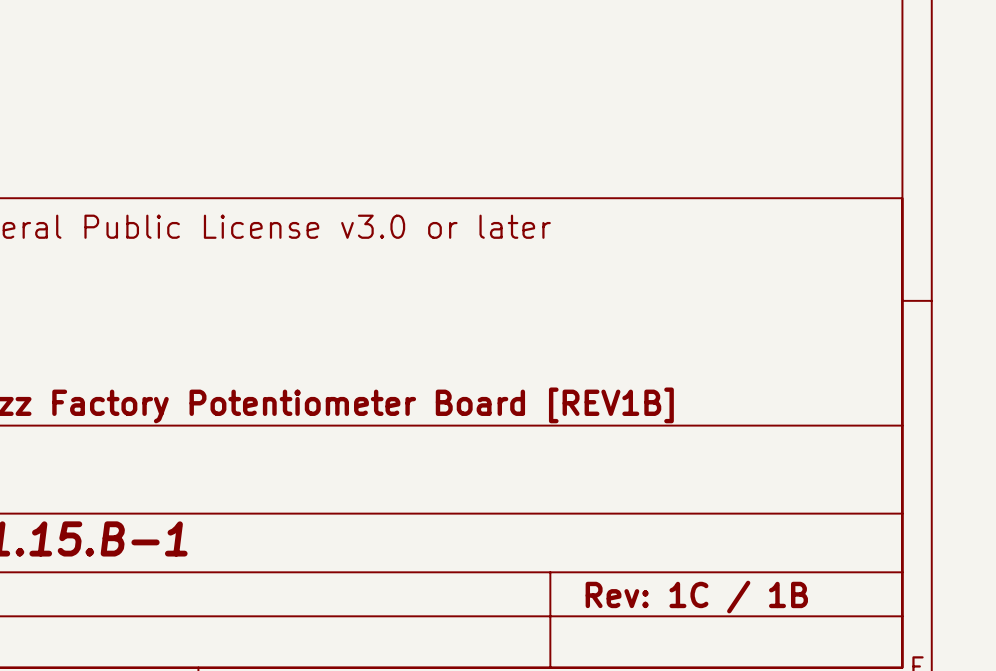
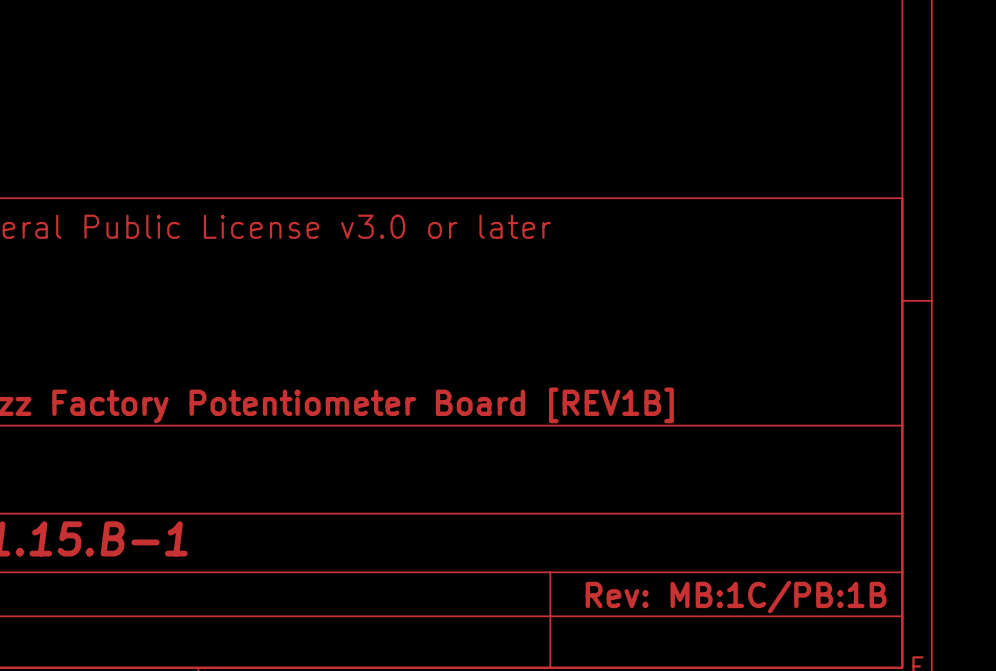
title block: Rev: 1C / 1B (696, 597) -> Rev: MB:1C/PB:1B (736, 597)

